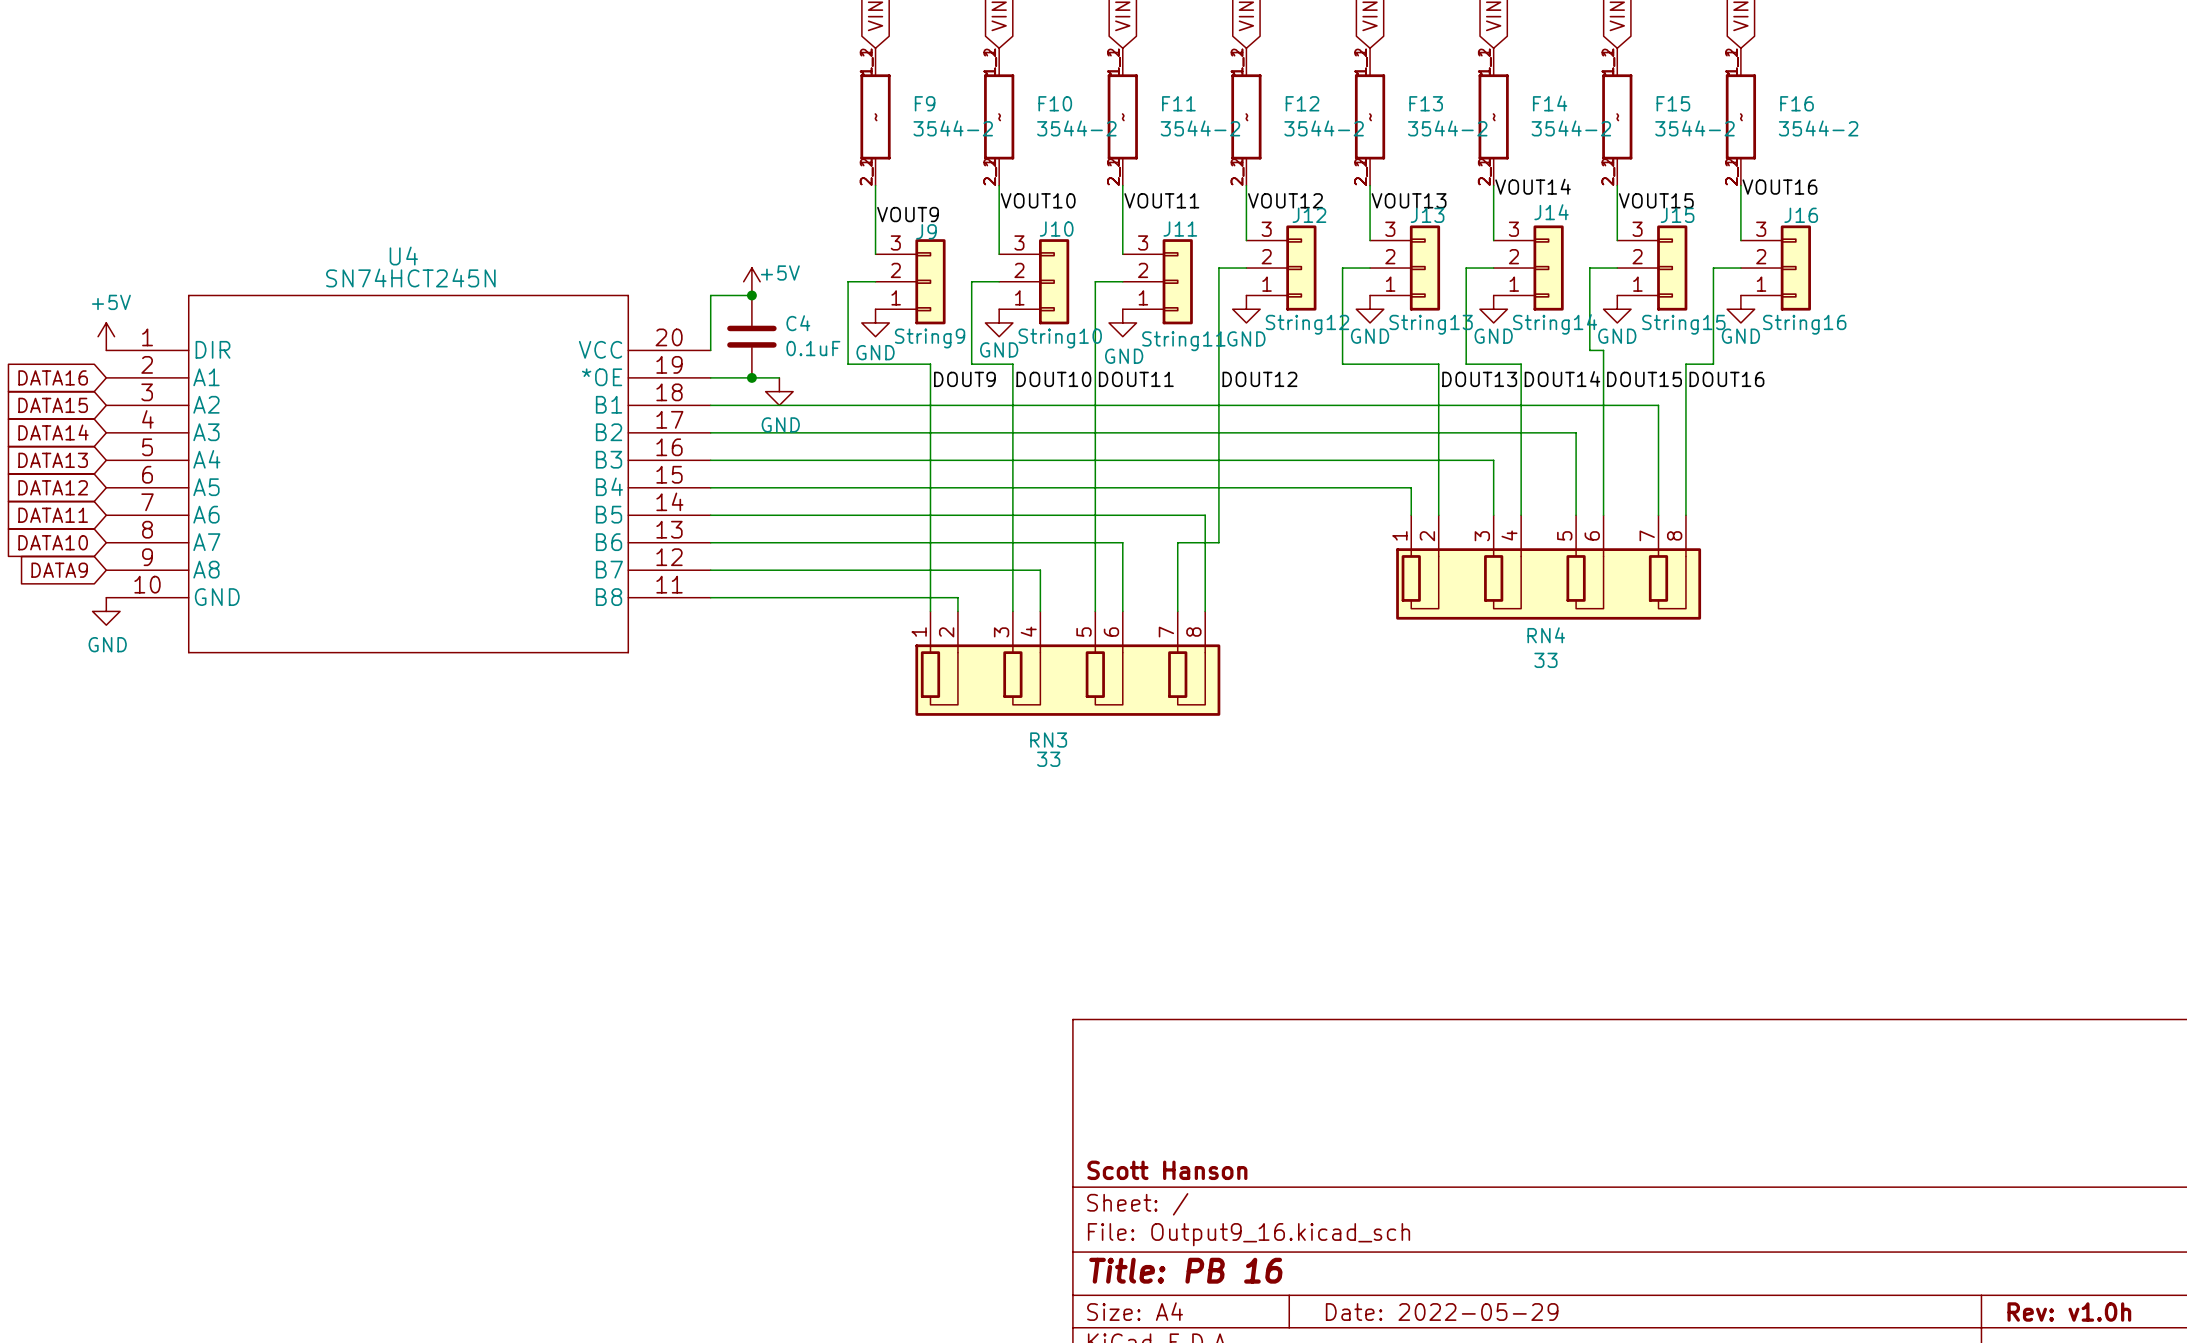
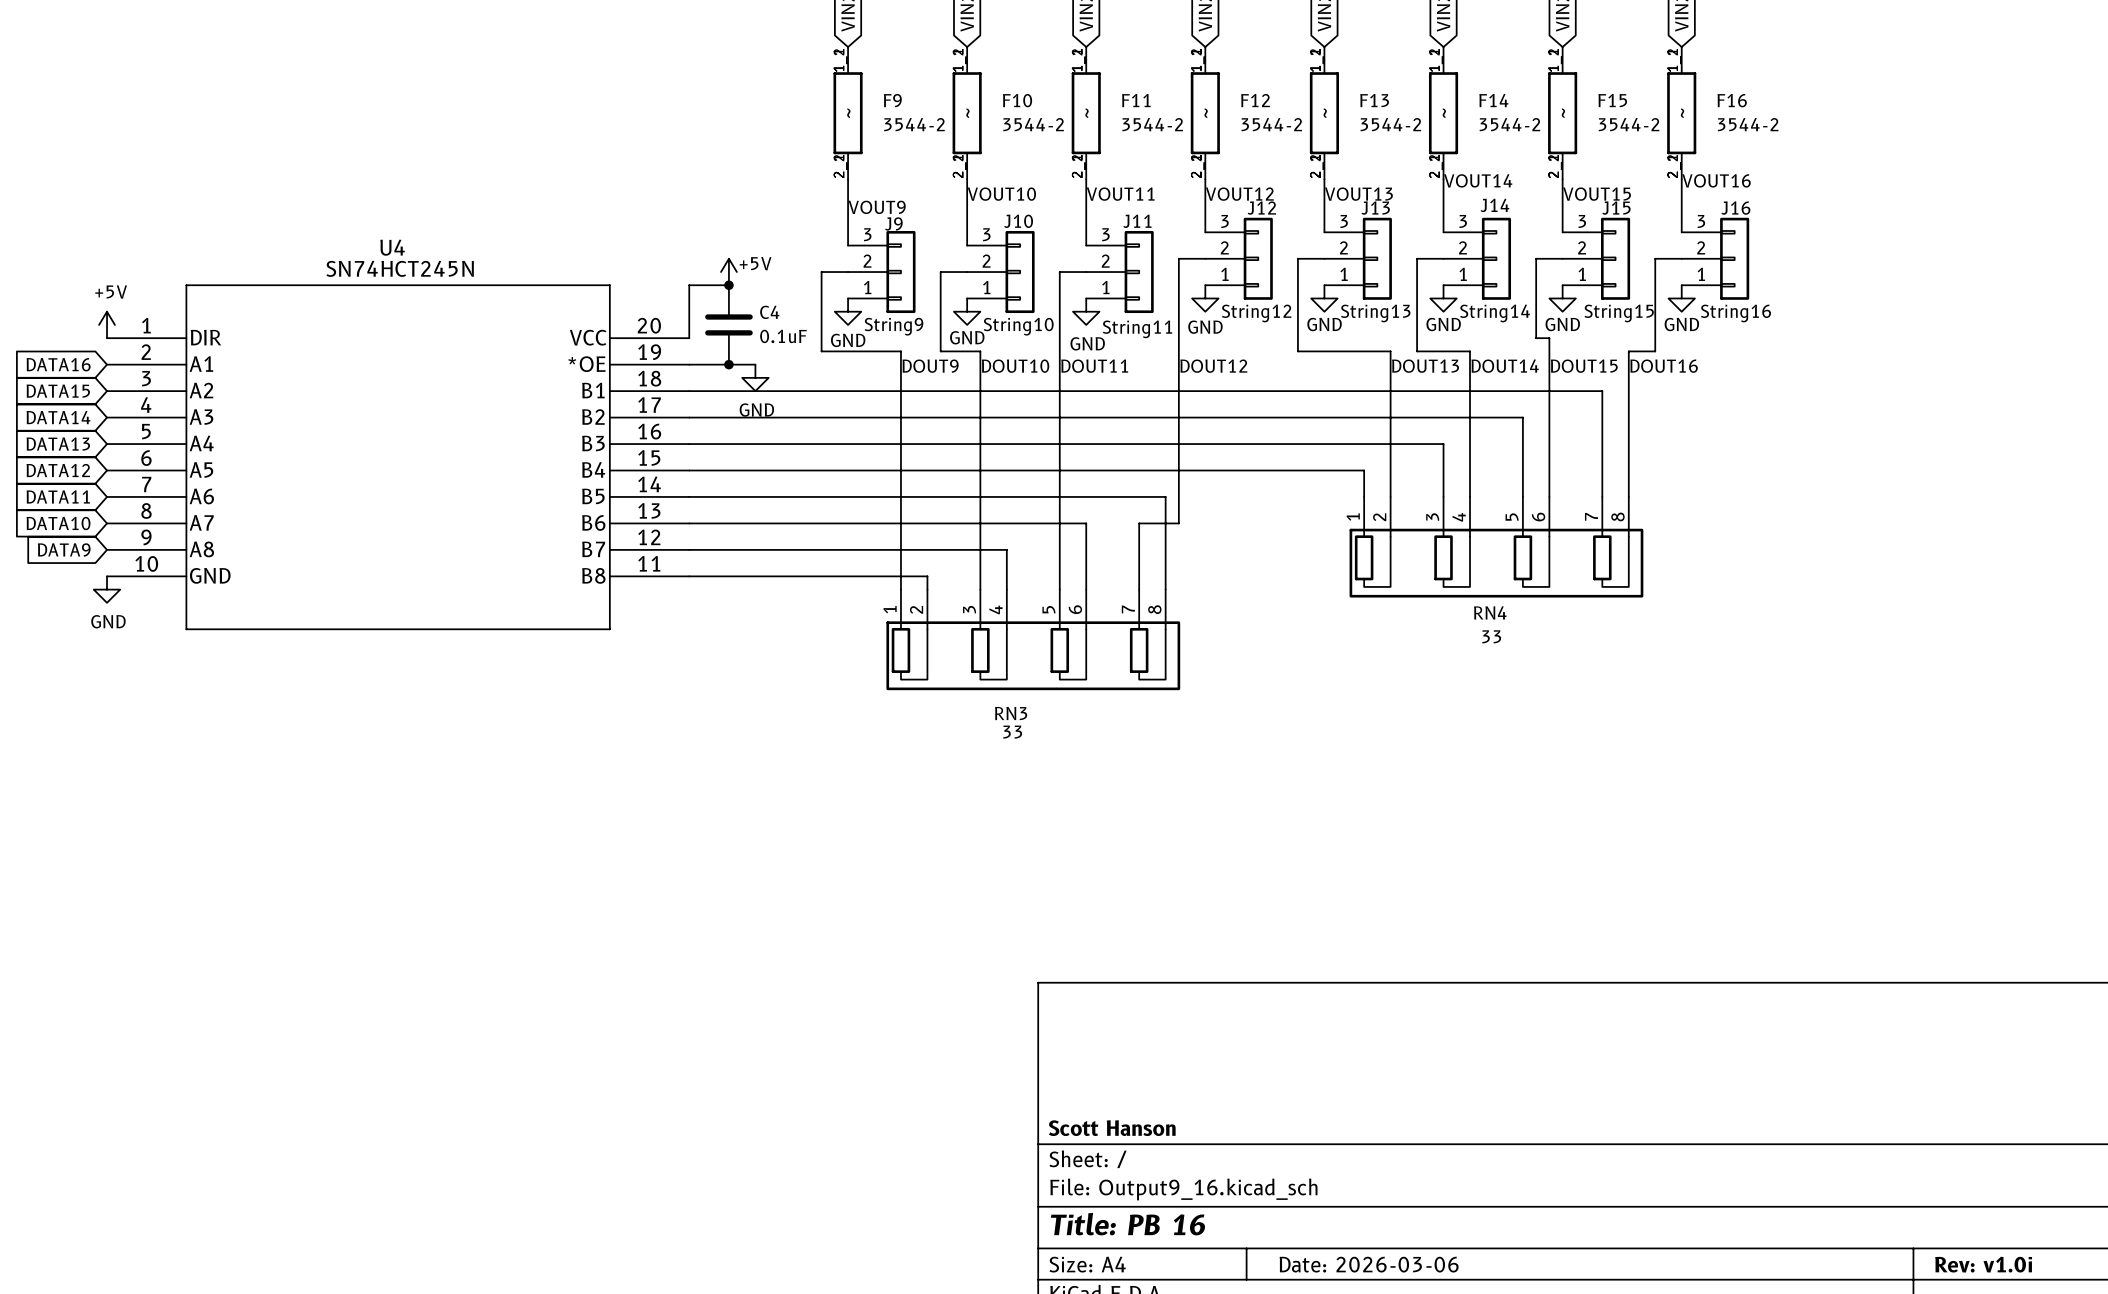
title block: Date: 2022-05-29 (1442, 1312) -> Date: 2026-03-06 (1369, 1264)
title block: Rev: v1.0h (2069, 1312) -> Rev: v1.0i (1983, 1264)

